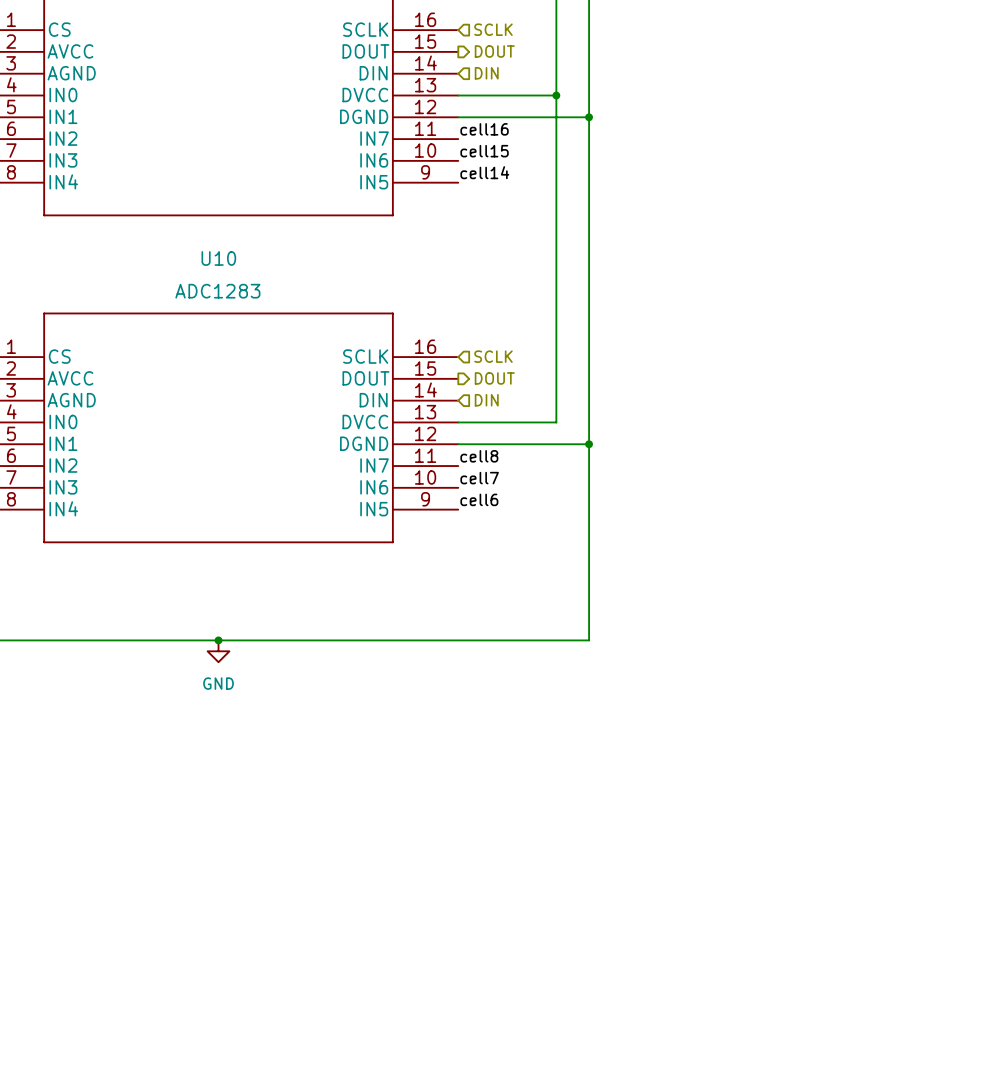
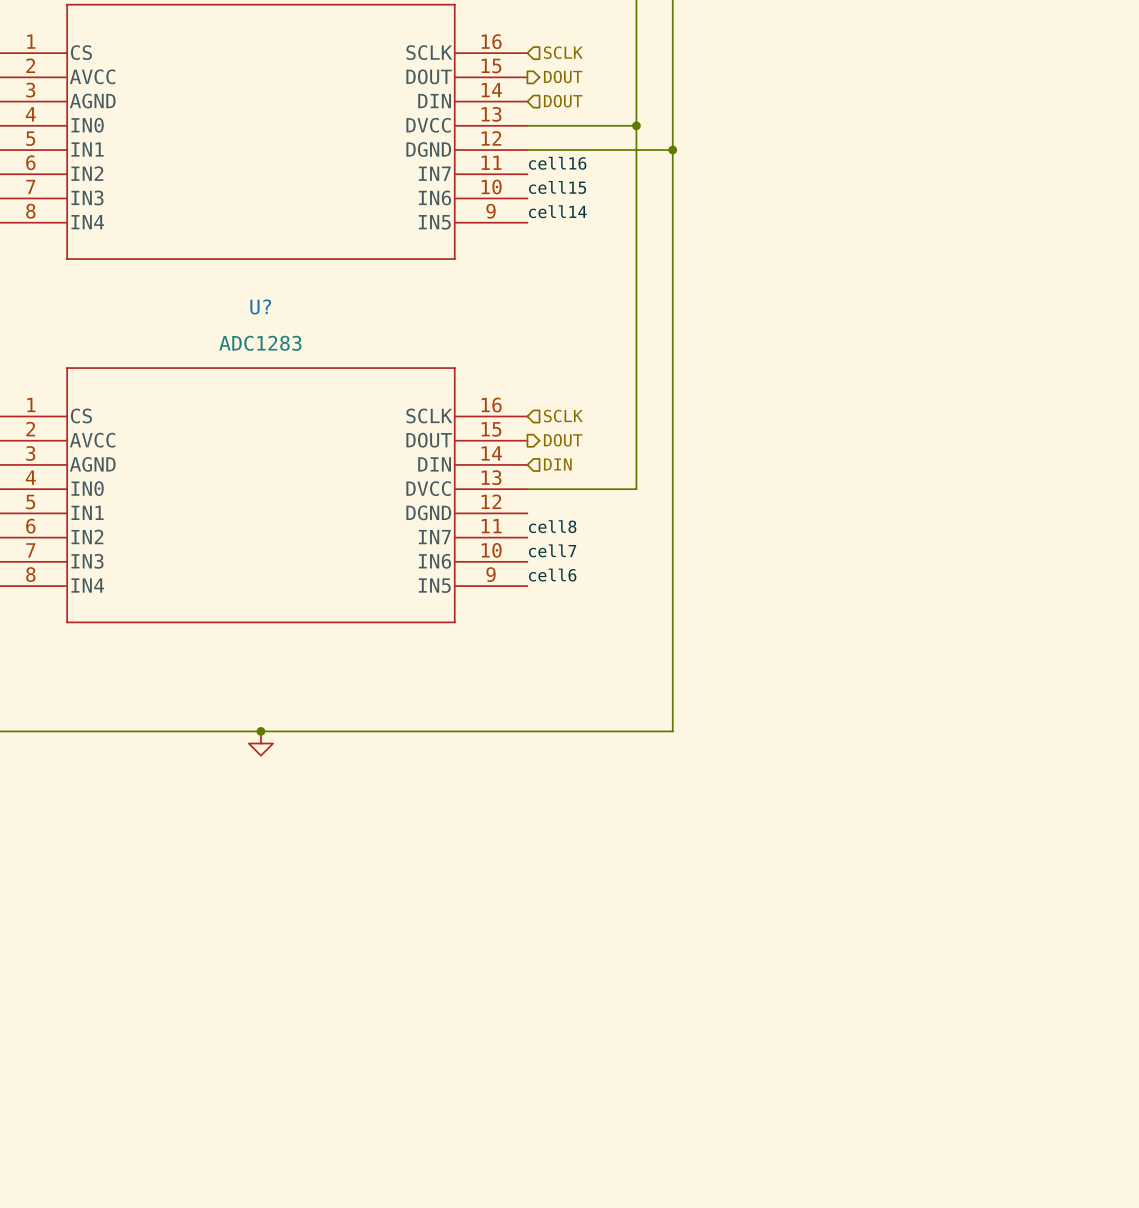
hierarchical label: DIN (486, 73) -> DOUT (563, 101)
U10 name: U10 (218, 258) -> U? (260, 306)
wire: (458, 444) (589, 444) -> none
junction: (589, 444) -> none
power symbol text: GND (218, 683) -> none

